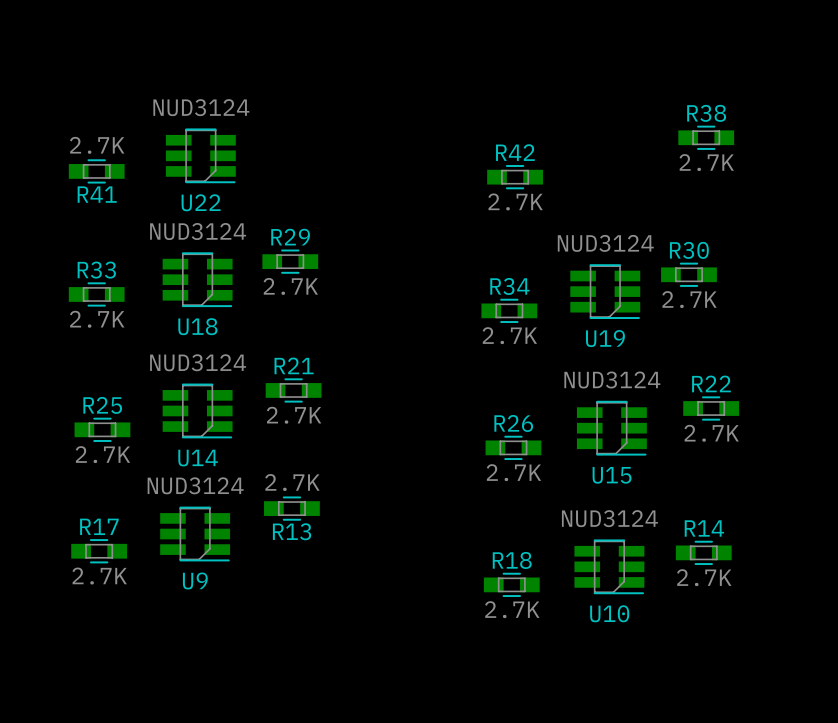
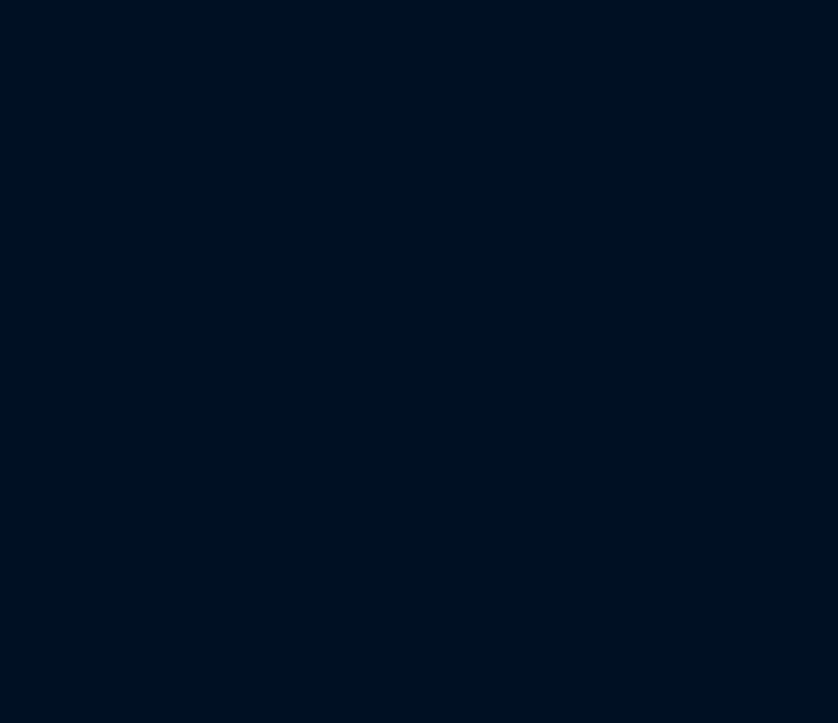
R38: 2.7K (706, 137) -> none
U22: NUD3124 (200, 155) -> none
R41: 2.7K (96, 171) -> none
R42: 2.7K (515, 177) -> none
R29: 2.7K (290, 261) -> none
R30: 2.7K (688, 274) -> none
U18: NUD3124 (197, 279) -> none
U19: NUD3124 (605, 291) -> none
R33: 2.7K (96, 294) -> none
R34: 2.7K (509, 310) -> none
R21: 2.7K (293, 390) -> none
R22: 2.7K (711, 408) -> none
U14: NUD3124 (197, 410) -> none
U15: NUD3124 (611, 428) -> none
R25: 2.7K (102, 429) -> none
R26: 2.7K (513, 447) -> none
R13: 2.7K (291, 508) -> none
U9: NUD3124 (195, 534) -> none
R17: 2.7K (99, 551) -> none
R14: 2.7K (703, 552) -> none
U10: NUD3124 (609, 566) -> none
R18: 2.7K (511, 584) -> none

